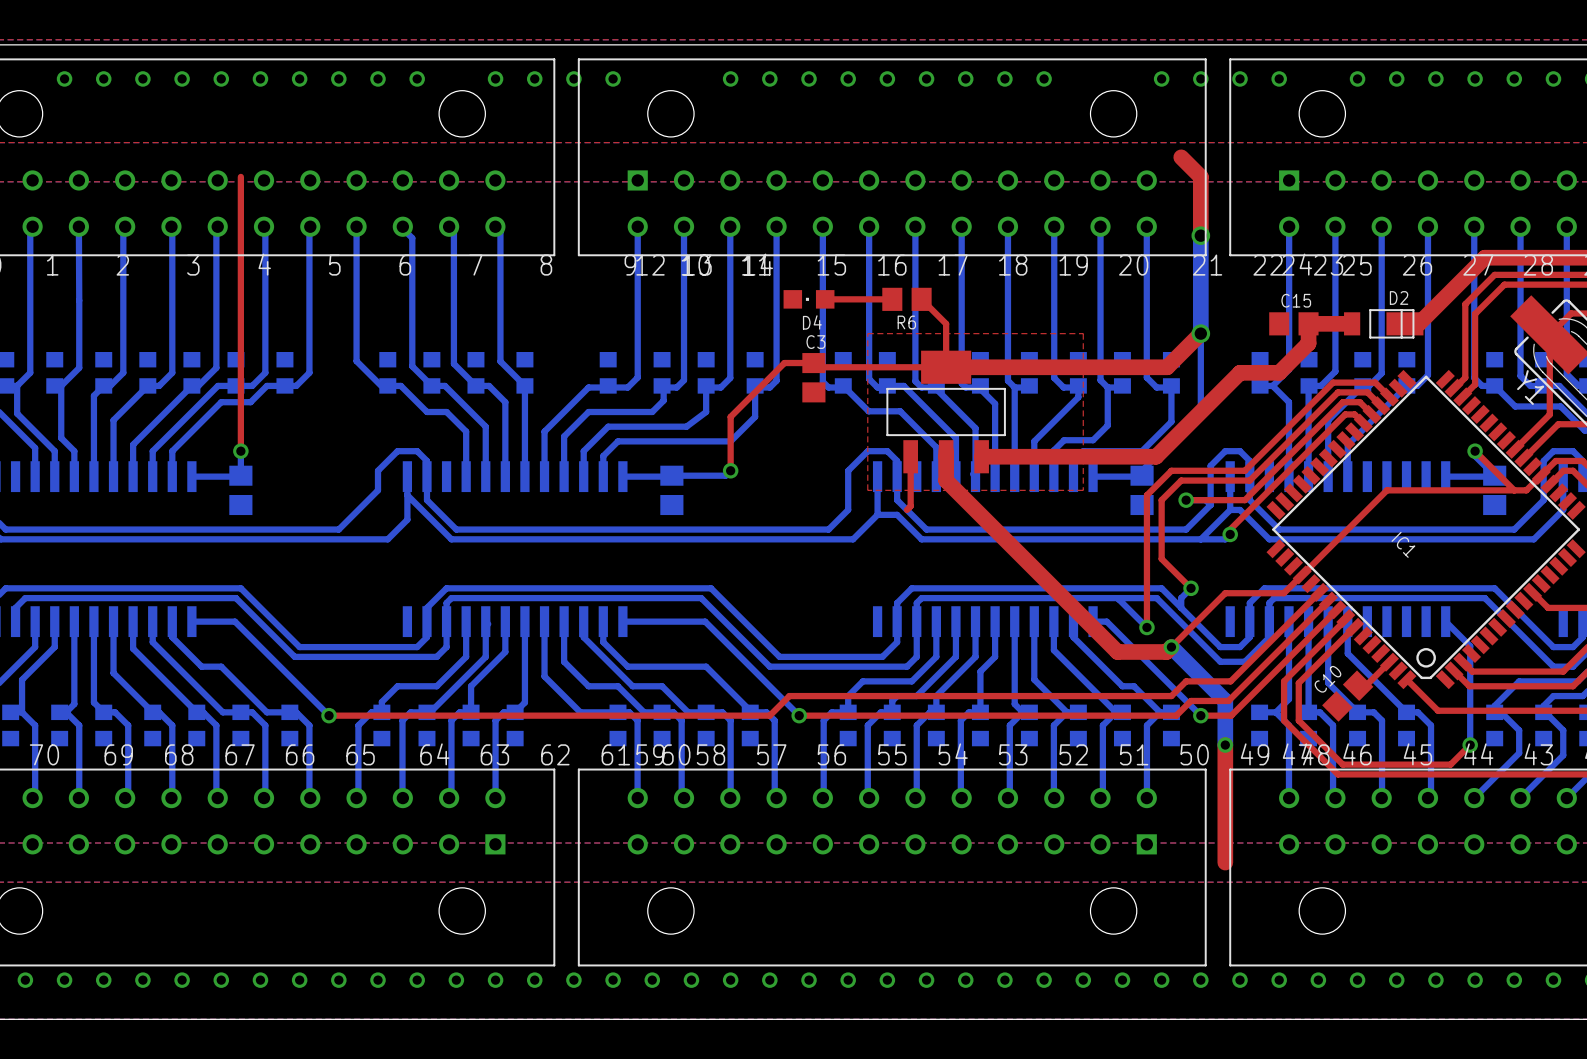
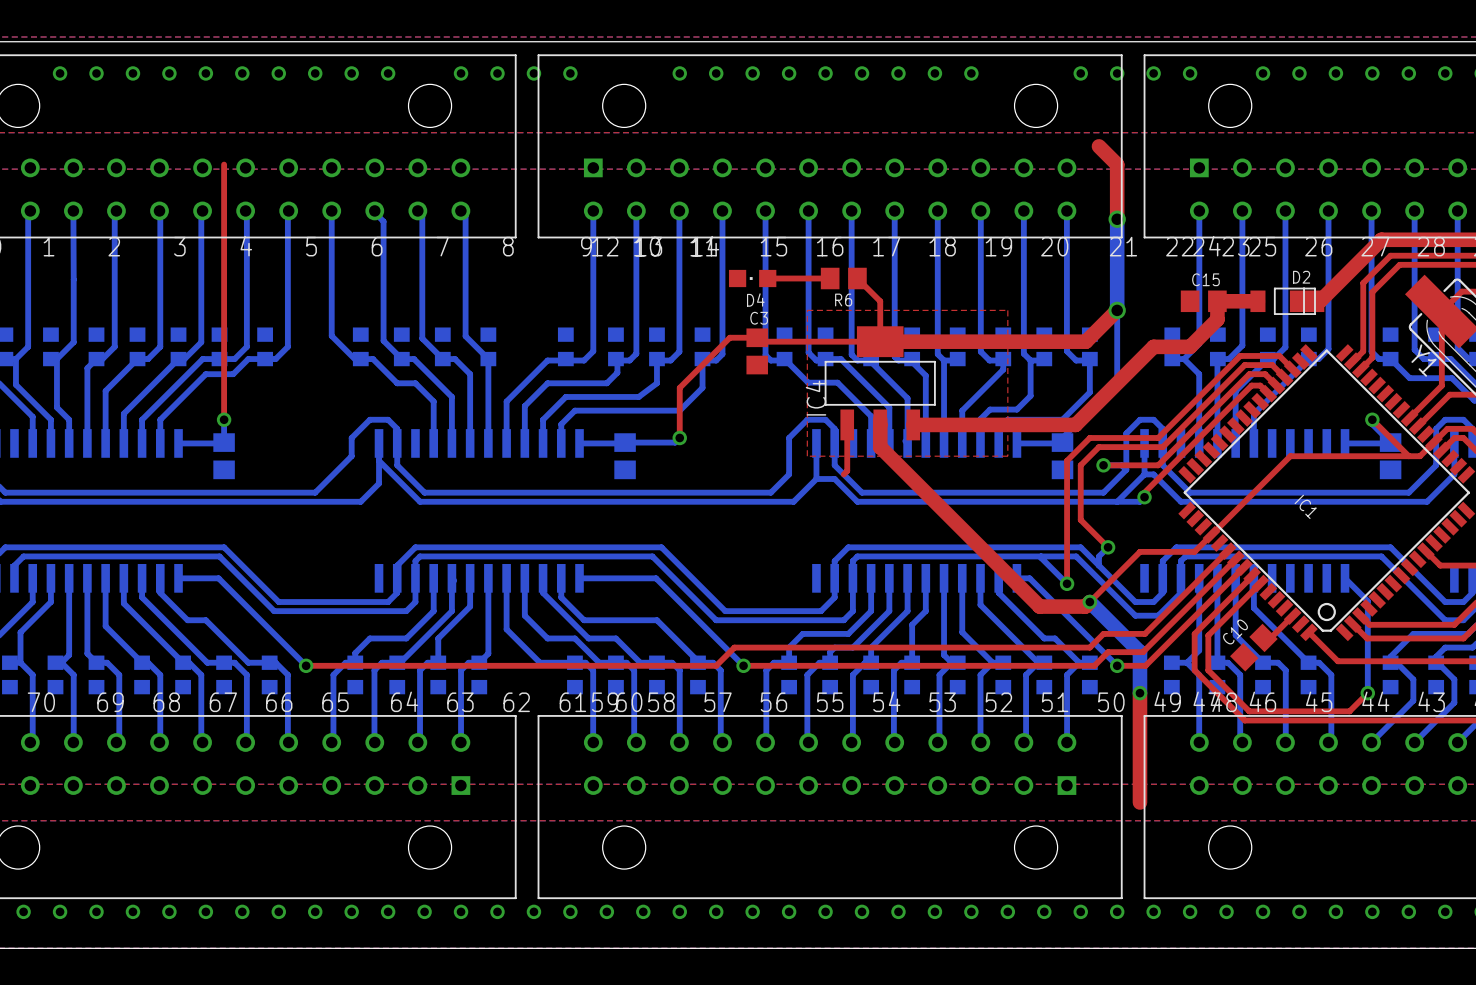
IC4 name: none -> IC4 (816, 398)

